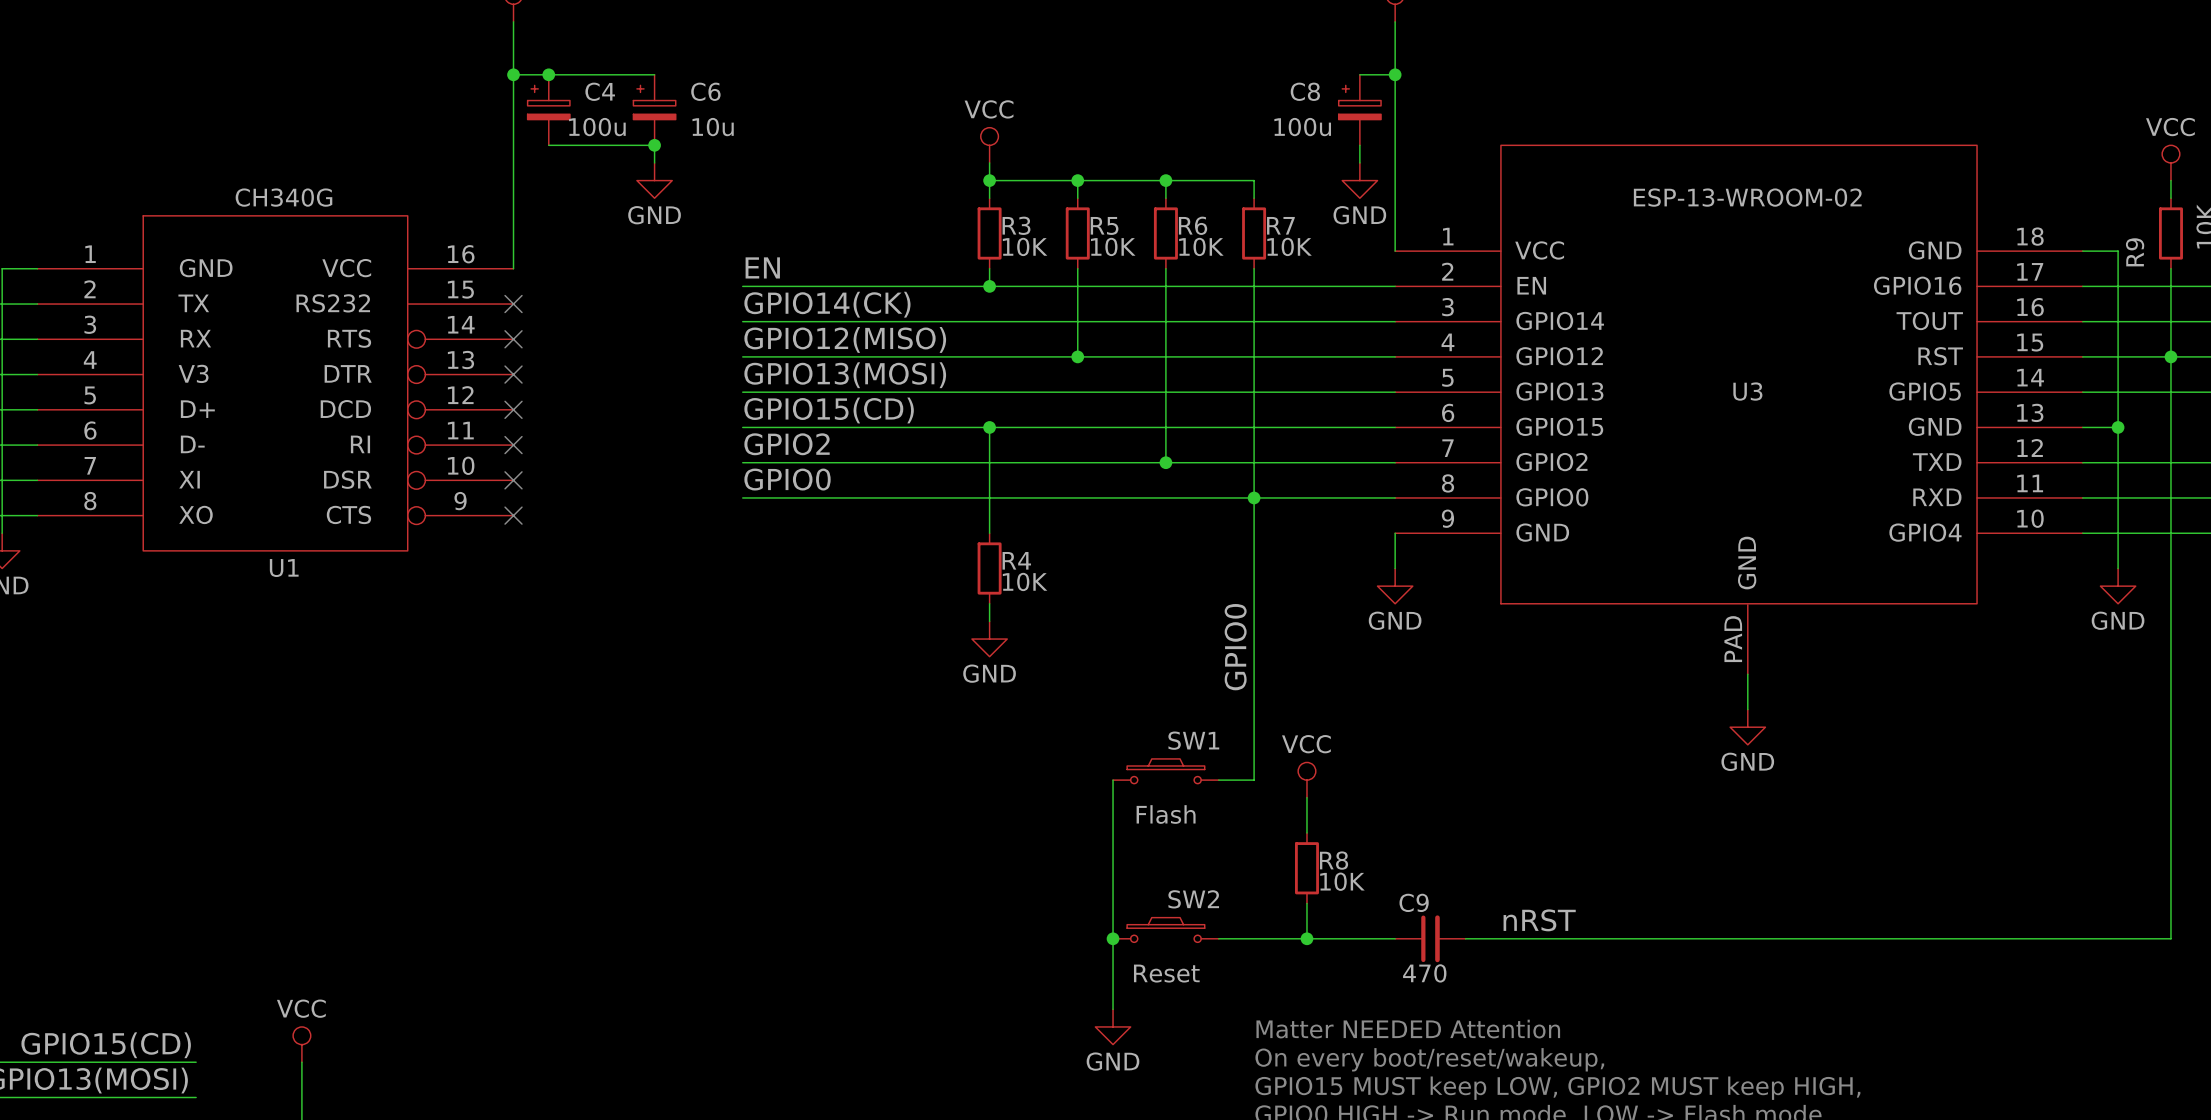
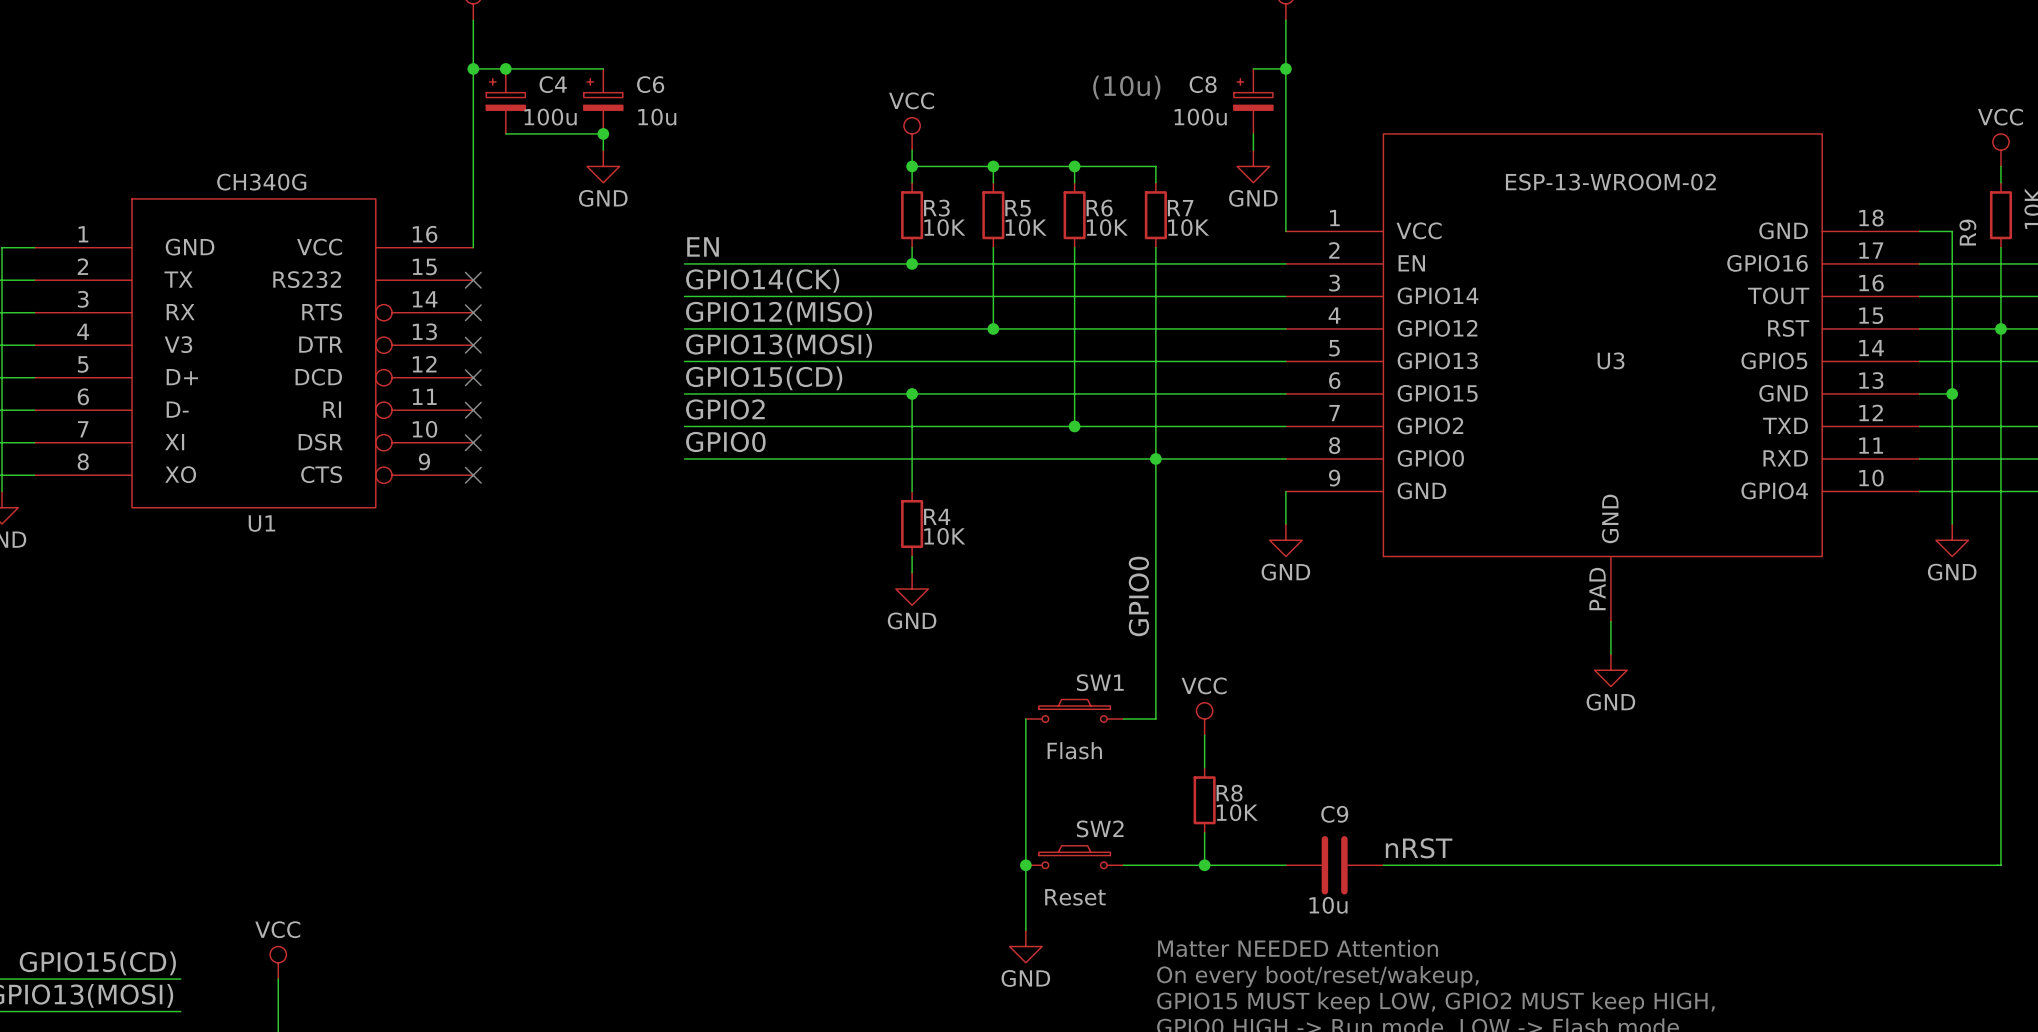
text: none -> (10u) (1126, 87)
C9 name position: C9 (1414, 902) -> C9 (1334, 814)
C9 symbol: [1395, 915, 1466, 963] -> [1285, 836, 1384, 895]
C9 value: 470 (1424, 973) -> 10u (1328, 905)

